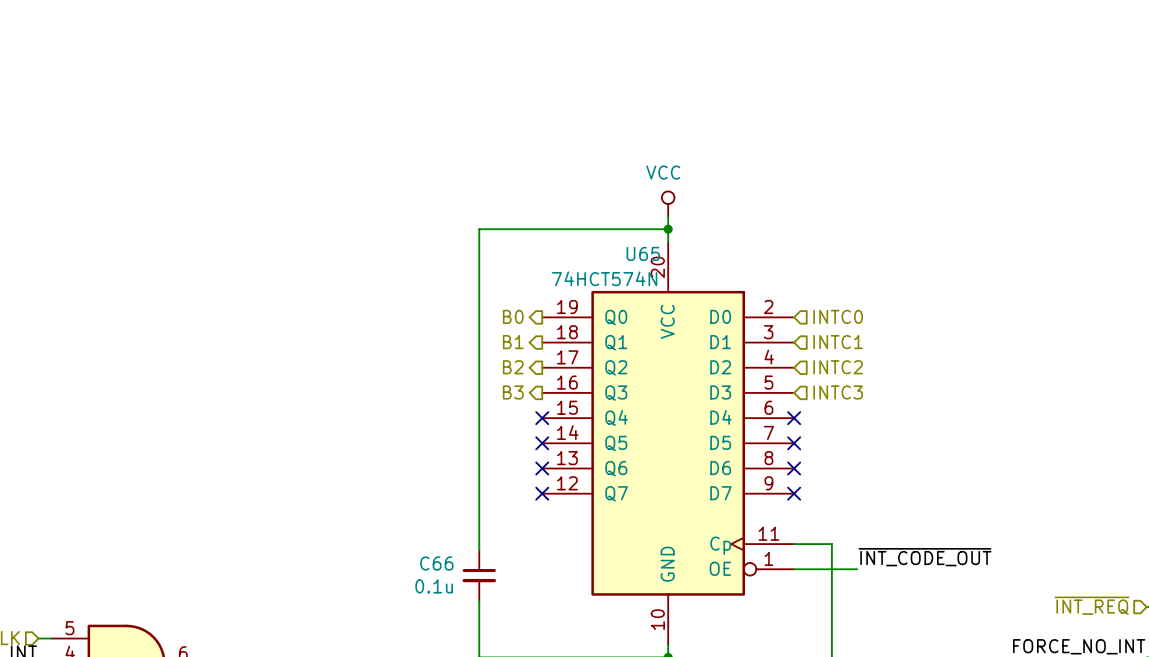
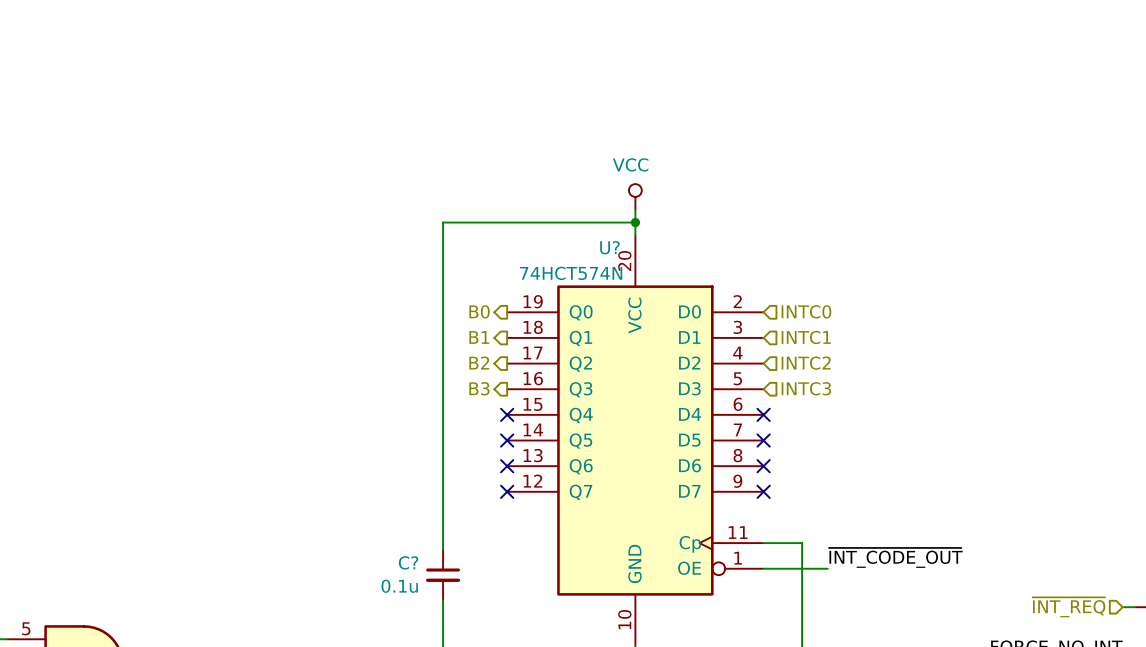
U65 name: U65 (643, 253) -> U? (609, 247)
C66 name: C66 (436, 563) -> C? (408, 562)

